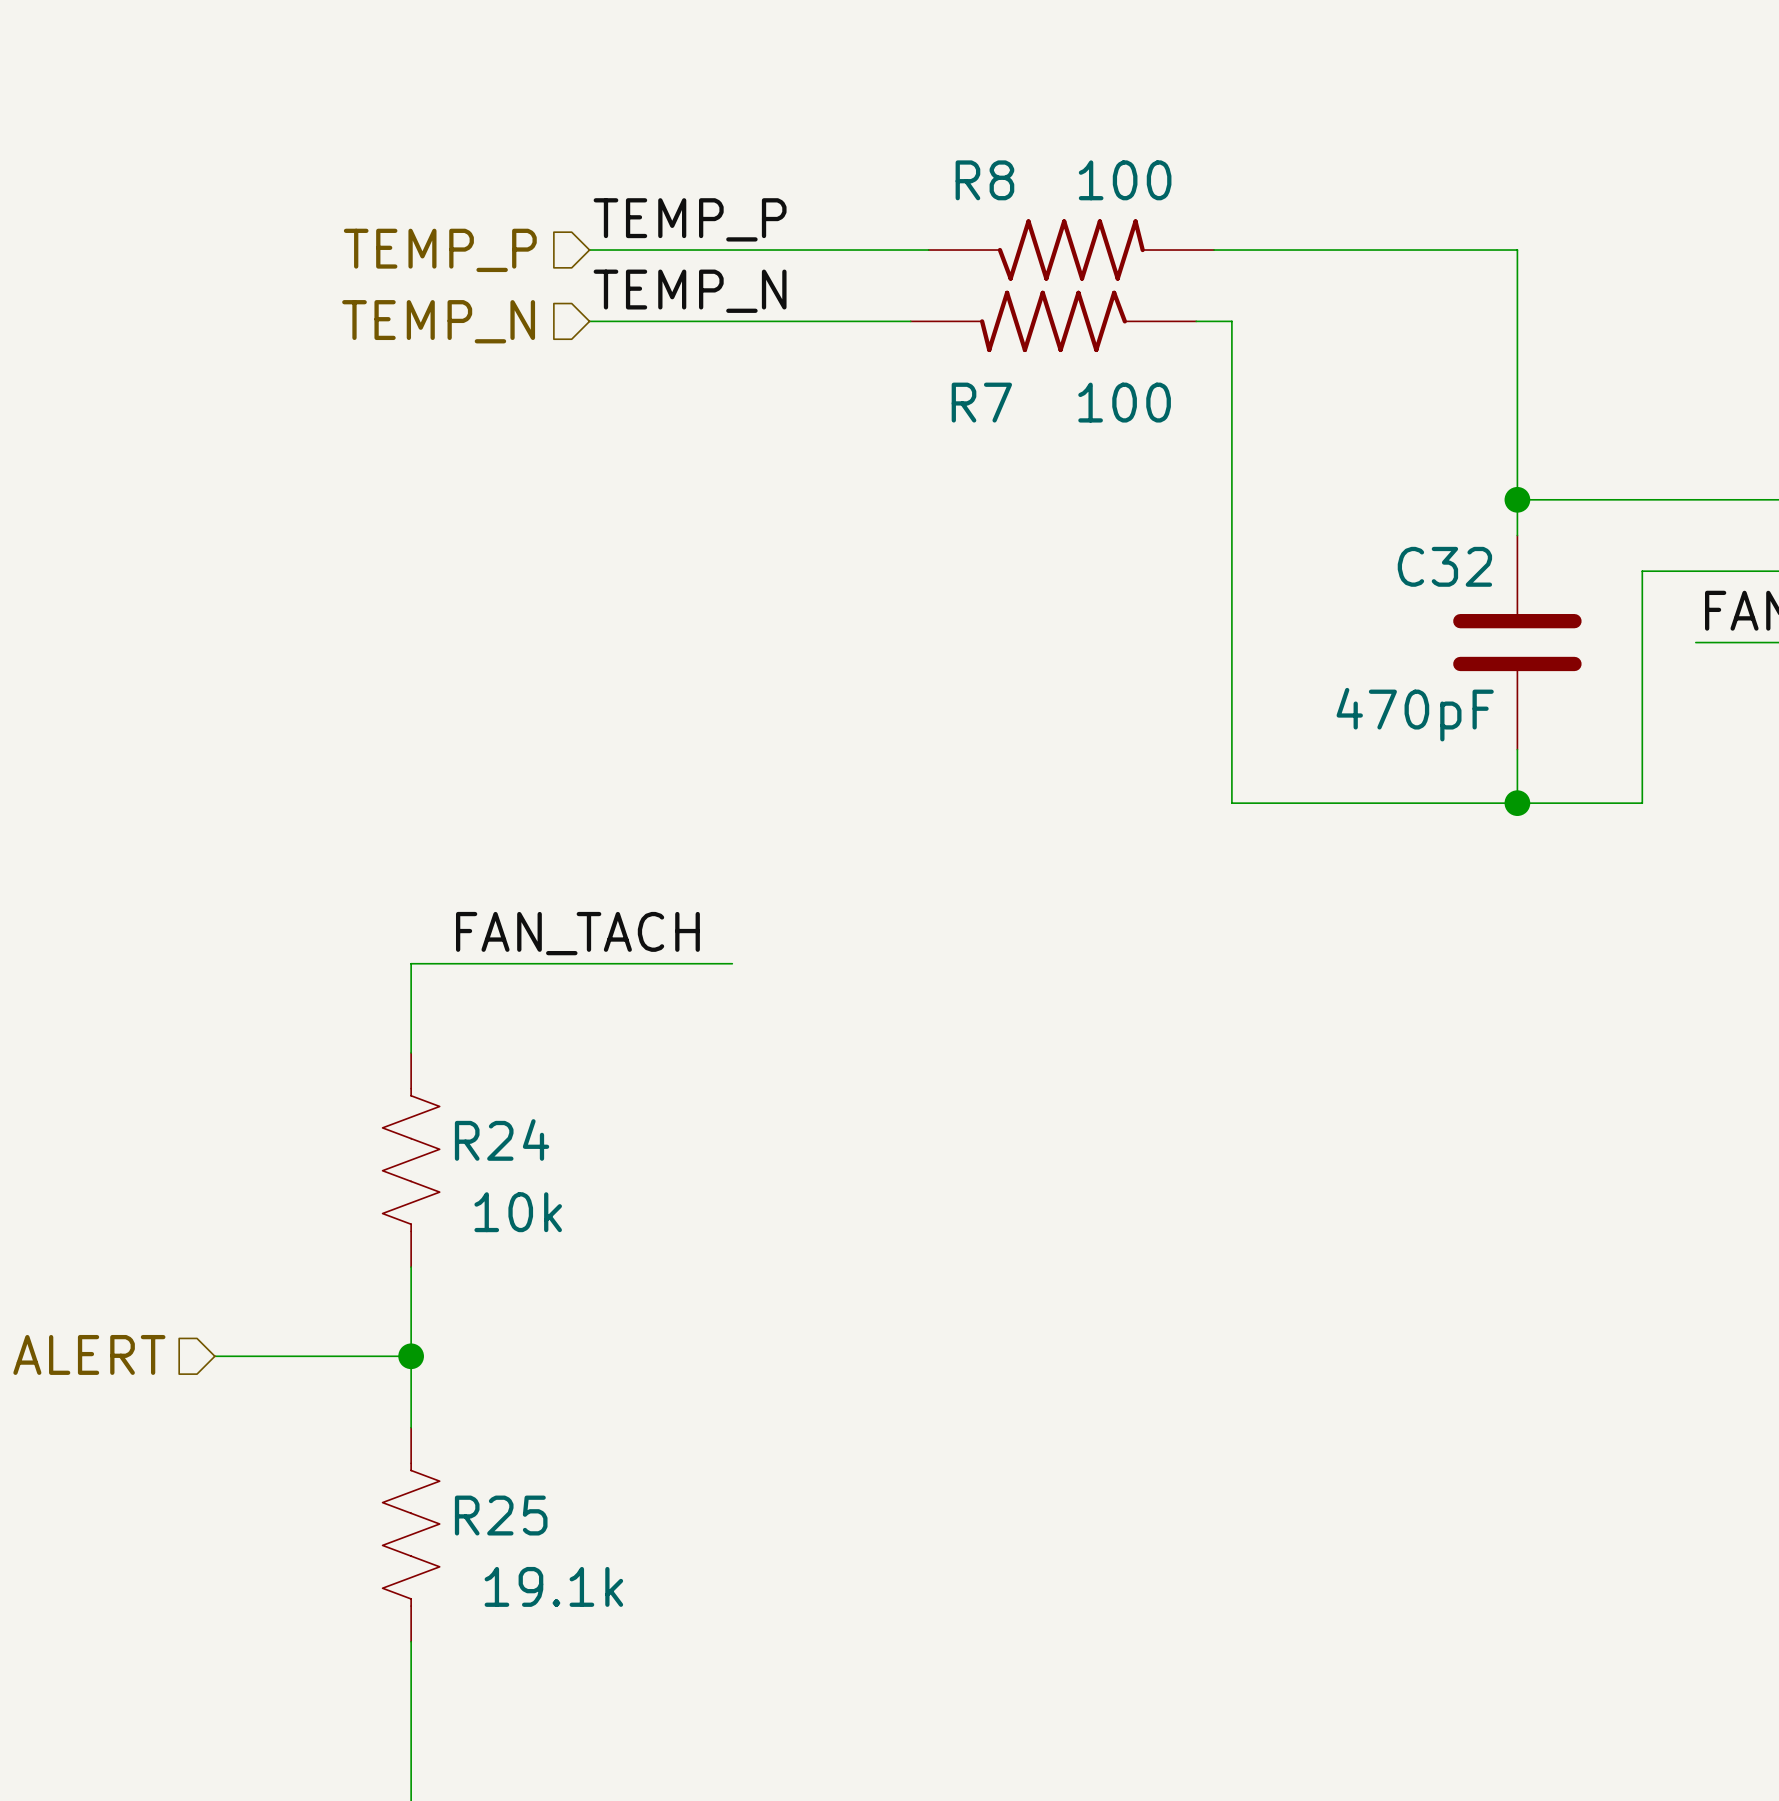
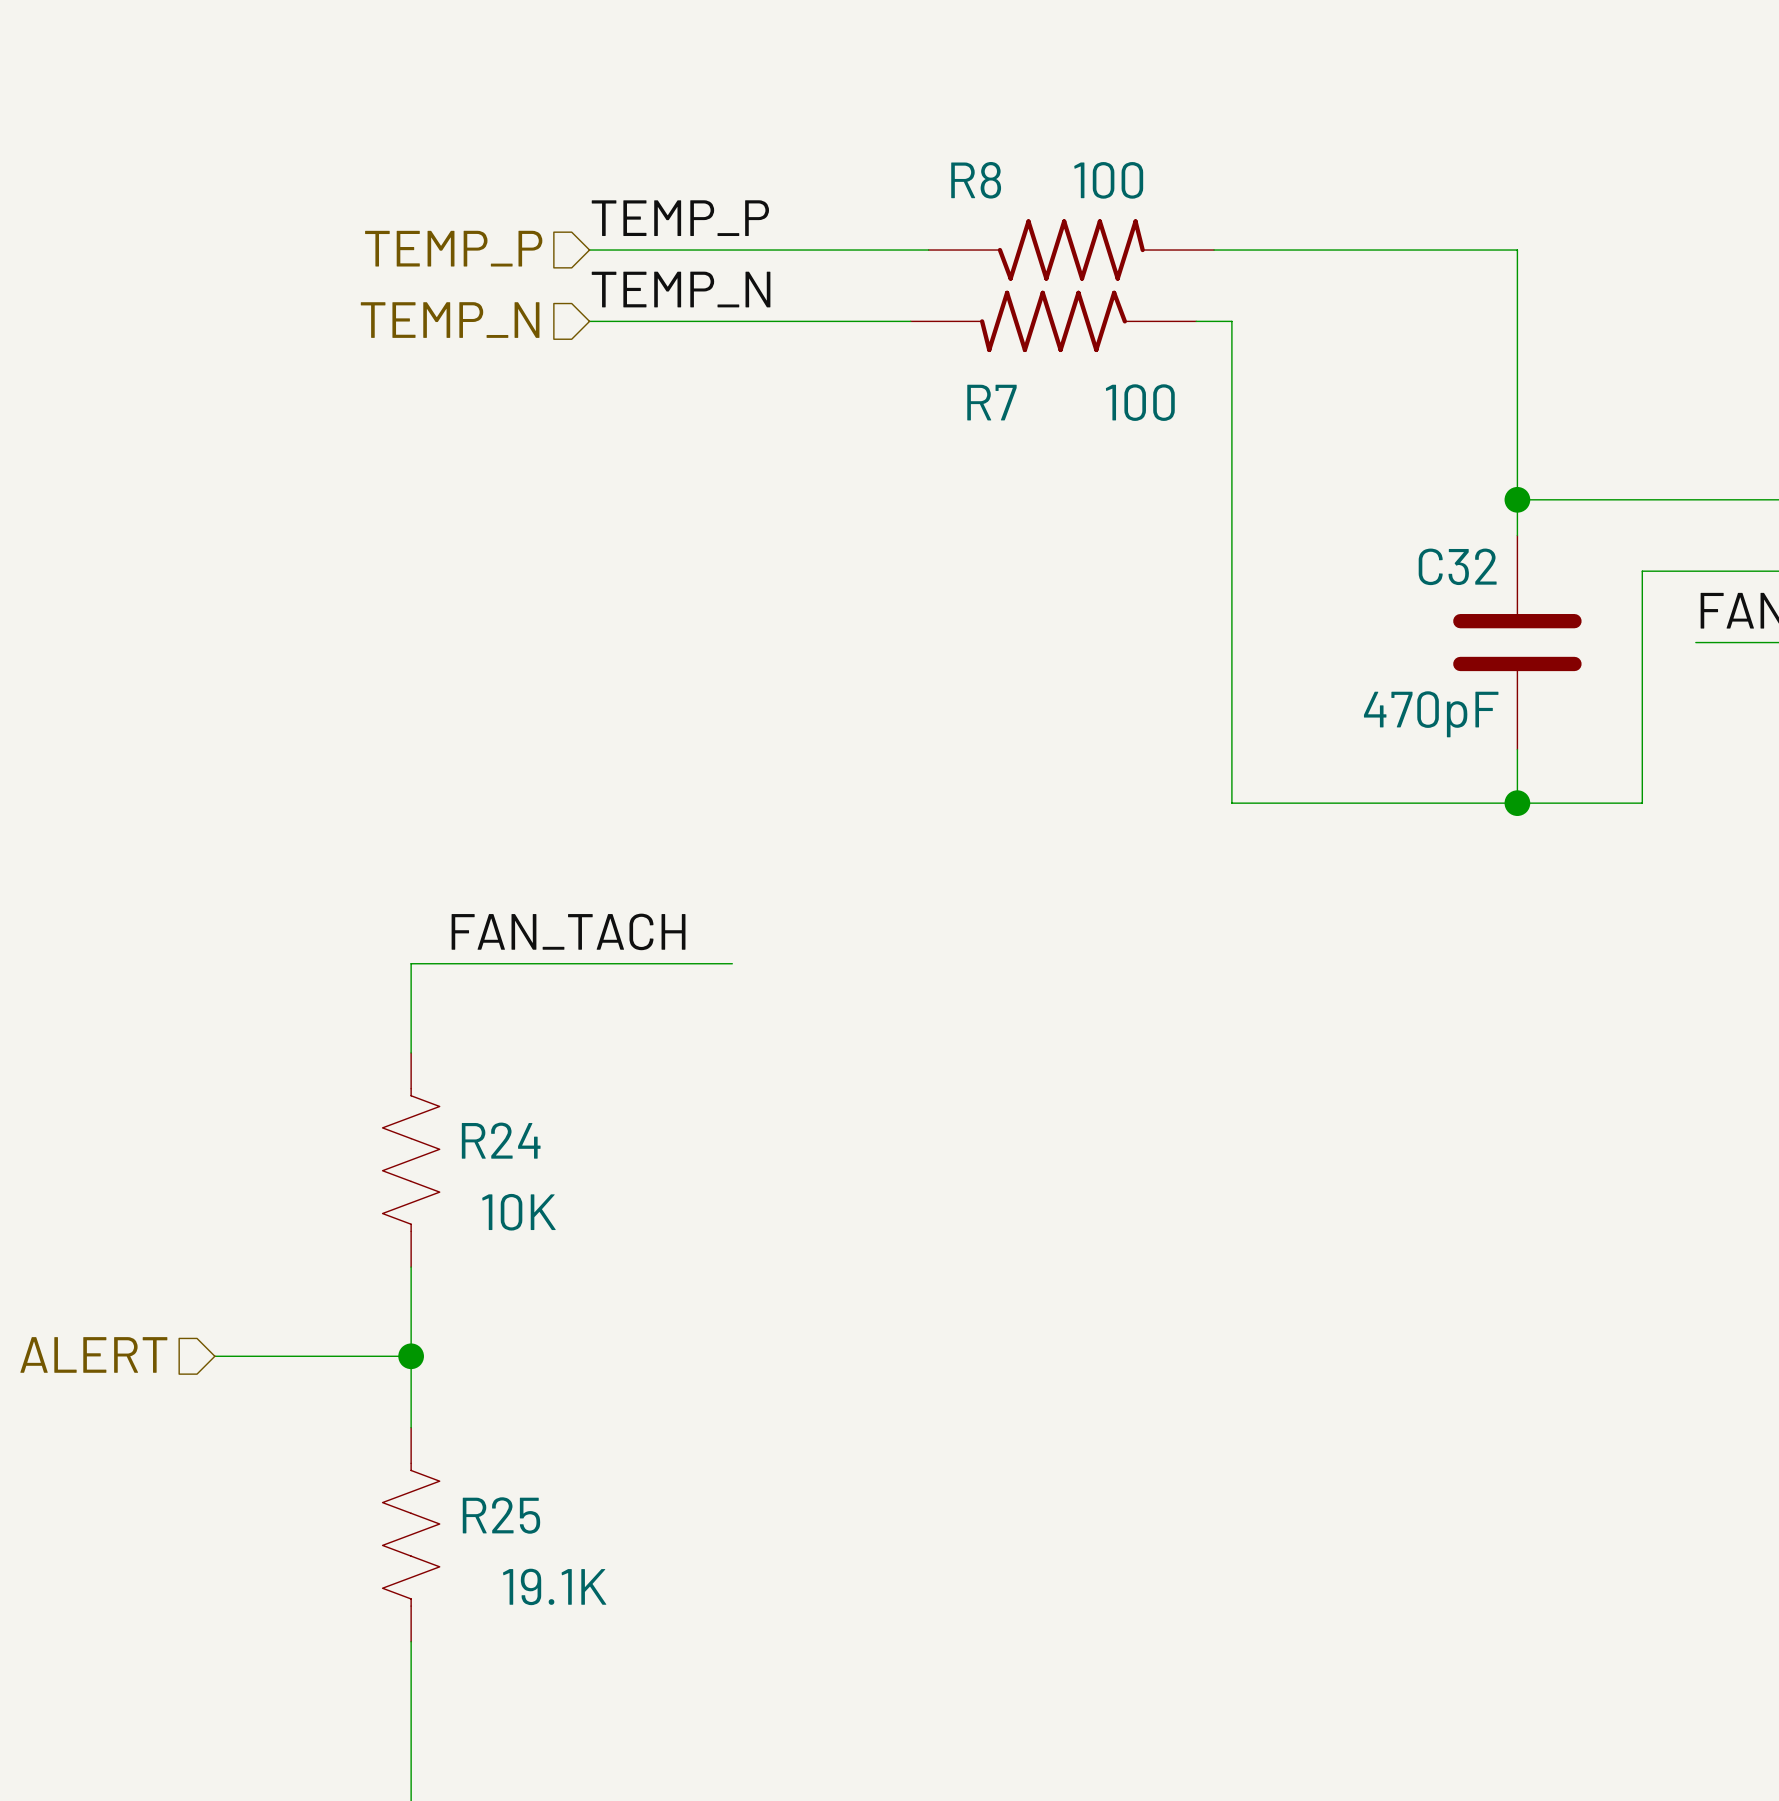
R24 value: 10k (518, 1212) -> 10K (518, 1212)
R25 value: 19.1k (553, 1586) -> 19.1K (554, 1586)

